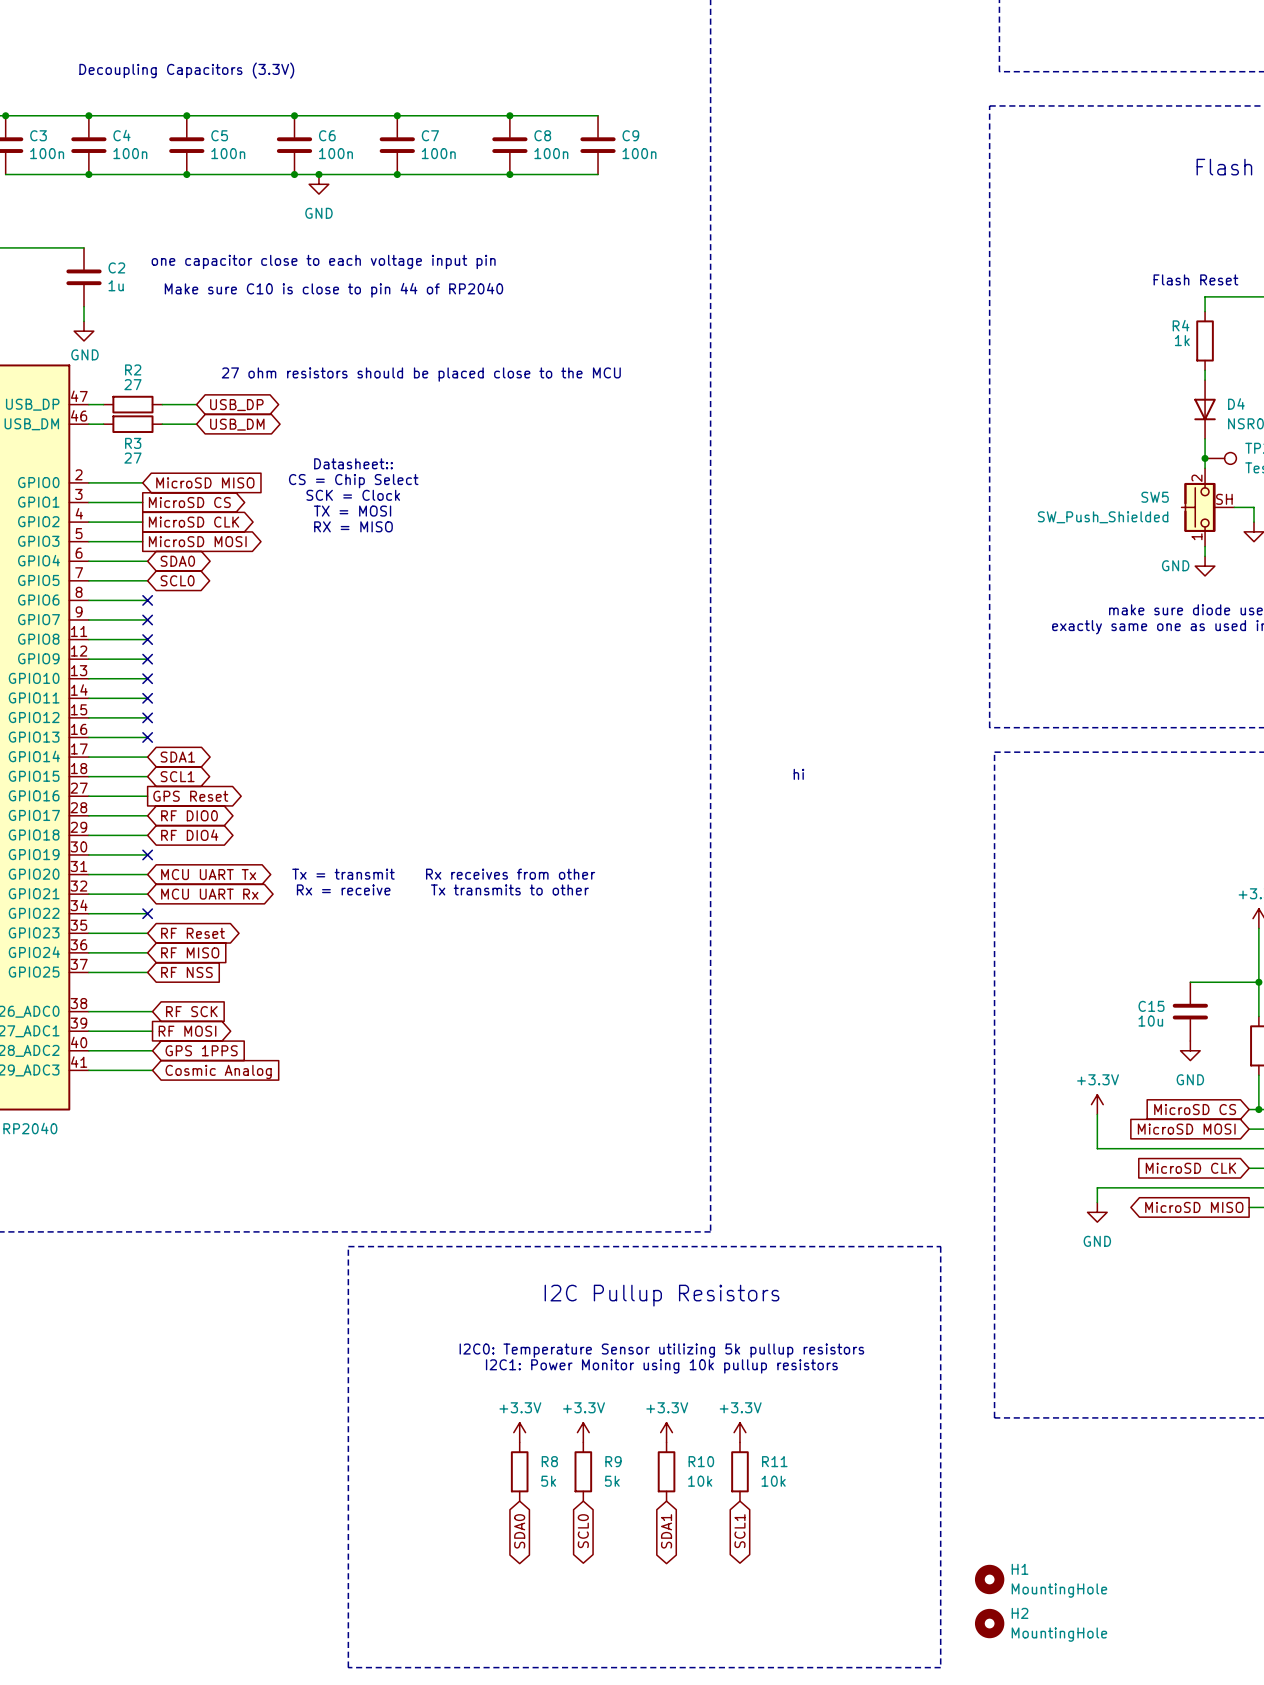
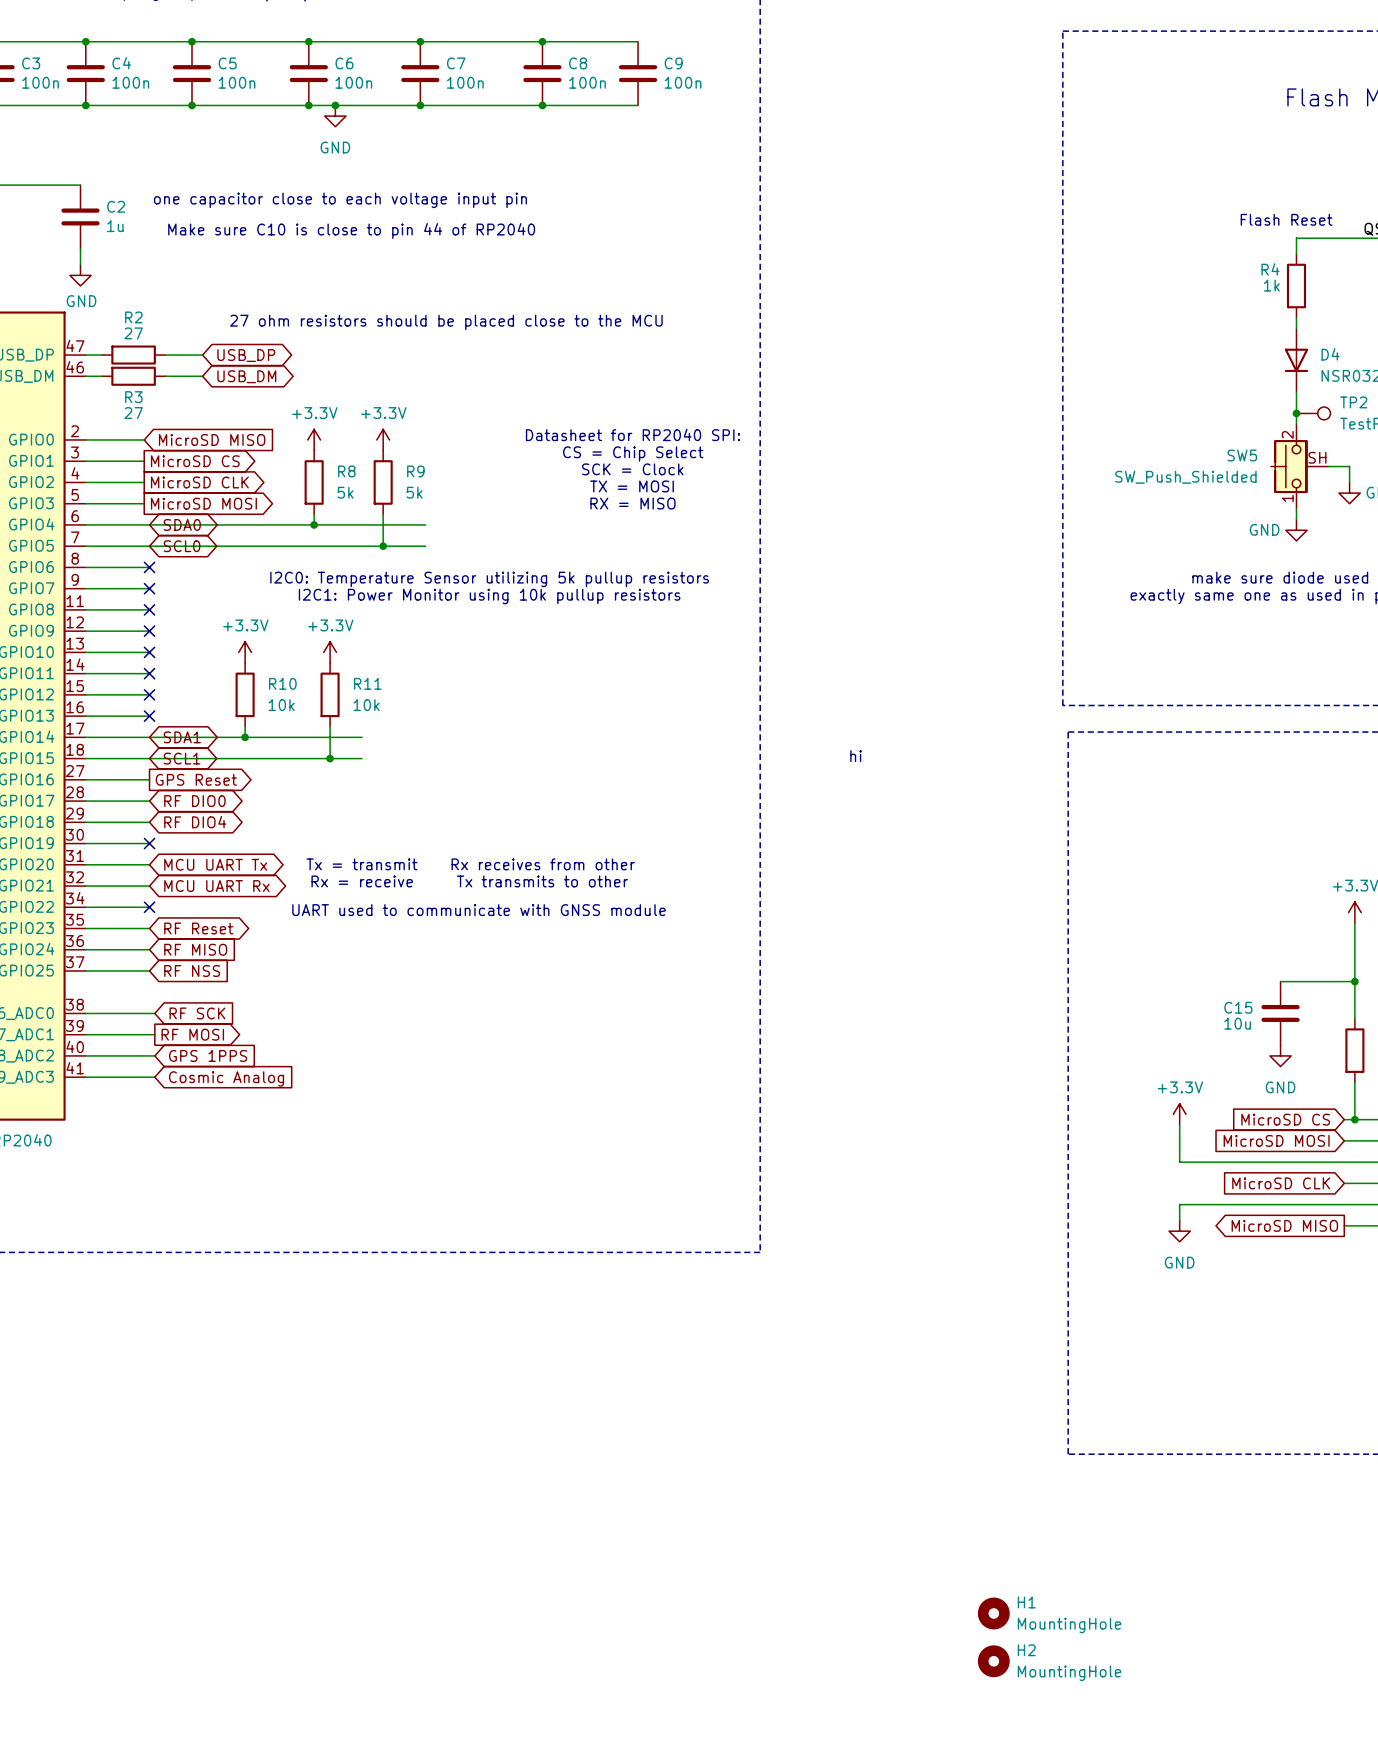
text: Datasheet:: (353, 463) -> none
text: none -> Datasheet for RP2040 SPI: (632, 434)
text: CS = Chip Select (353, 481) -> none
power symbol: none -> +3.3V (314, 439)
power symbol: none -> +3.3V (383, 439)
text: SCK = Clock (353, 495) -> none
text: none -> CS = Chip Select (633, 454)
text: none -> SCK = Clock (632, 469)
text: TX = MOSI (352, 511) -> none
text: none -> TX = MOSI (631, 486)
text: RX = MISO (353, 526) -> none
text: none -> RX = MISO (632, 503)
wire: none -> (314, 514) (314, 524)
wire: none -> (383, 514) (383, 546)
wire: none -> (149, 524) (425, 524)
junction: none -> (314, 524)
wire: none -> (149, 546) (425, 546)
junction: none -> (383, 546)
text: none -> I2C0: Temperature Sensor utilizing 5k pullup resistors (489, 579)
text: none -> I2C1: Power Monitor using 10k pullup resistors (489, 596)
power symbol: none -> +3.3V (245, 652)
power symbol: none -> +3.3V (330, 652)
wire: none -> (245, 726) (245, 737)
wire: none -> (330, 726) (330, 758)
wire: none -> (149, 737) (361, 737)
junction: none -> (245, 737)
wire: none -> (149, 758) (361, 758)
junction: none -> (330, 758)
text: none -> UART used to communicate with GNSS module (479, 910)
line: (348, 1246) (940, 1246) (940, 1667) (348, 1667) (348, 1246) -> none
text: I2C Pullup Resistors (662, 1295) -> none
text: I2C0: Temperature Sensor utilizing 5k pullup resistors (661, 1350) -> none
text: I2C1: Power Monitor using 10k pullup resistors (661, 1366) -> none
power symbol: +3.3V (519, 1432) -> none
power symbol: +3.3V (583, 1432) -> none
power symbol: +3.3V (666, 1432) -> none
power symbol: +3.3V (739, 1432) -> none
R8 position: (519, 1471) -> (314, 482)
R9 position: (583, 1471) -> (383, 482)
R10 position: (666, 1471) -> (245, 694)
R11 position: (739, 1471) -> (330, 694)
global label: SDA0 (519, 1531) -> none
global label: SCL0 (583, 1531) -> none
global label: SDA1 (666, 1531) -> none
global label: SCL1 (739, 1531) -> none
H1 position: (989, 1579) -> (993, 1613)
H2 position: (989, 1623) -> (993, 1661)

